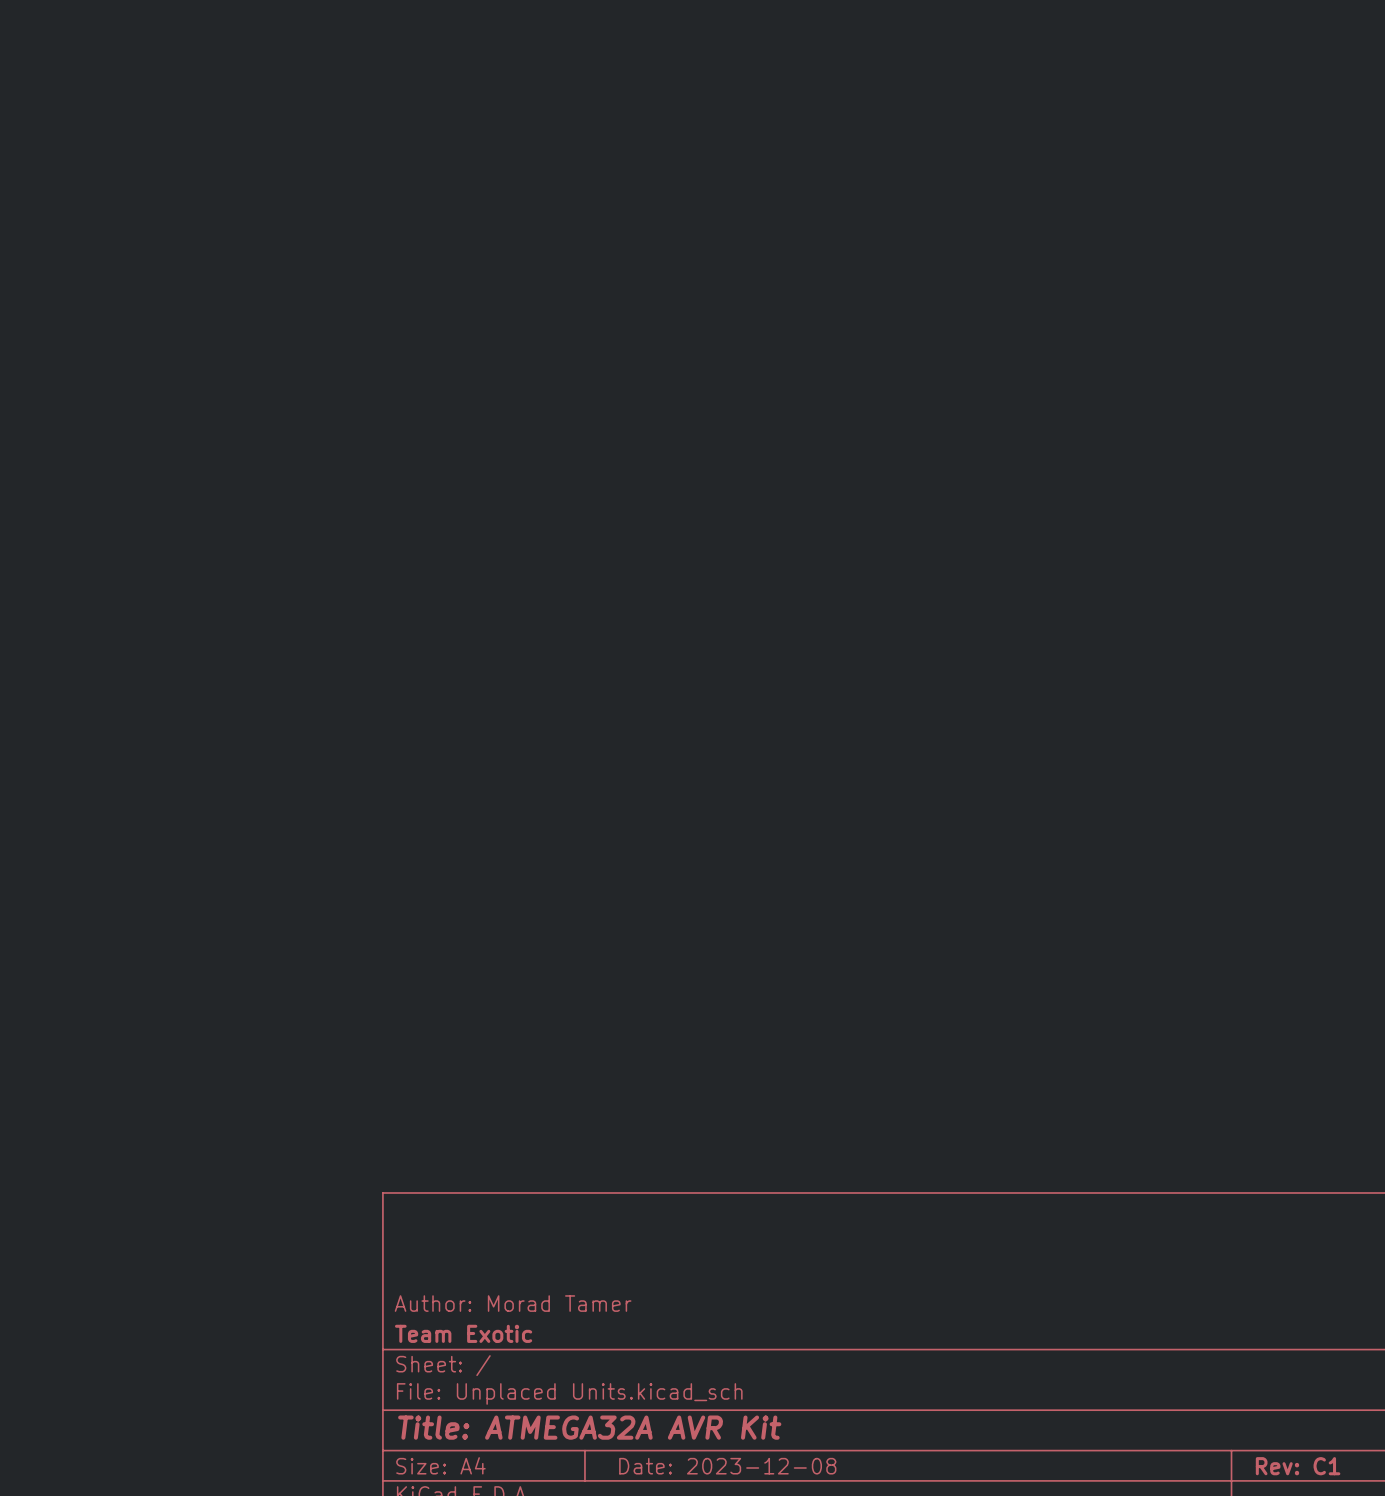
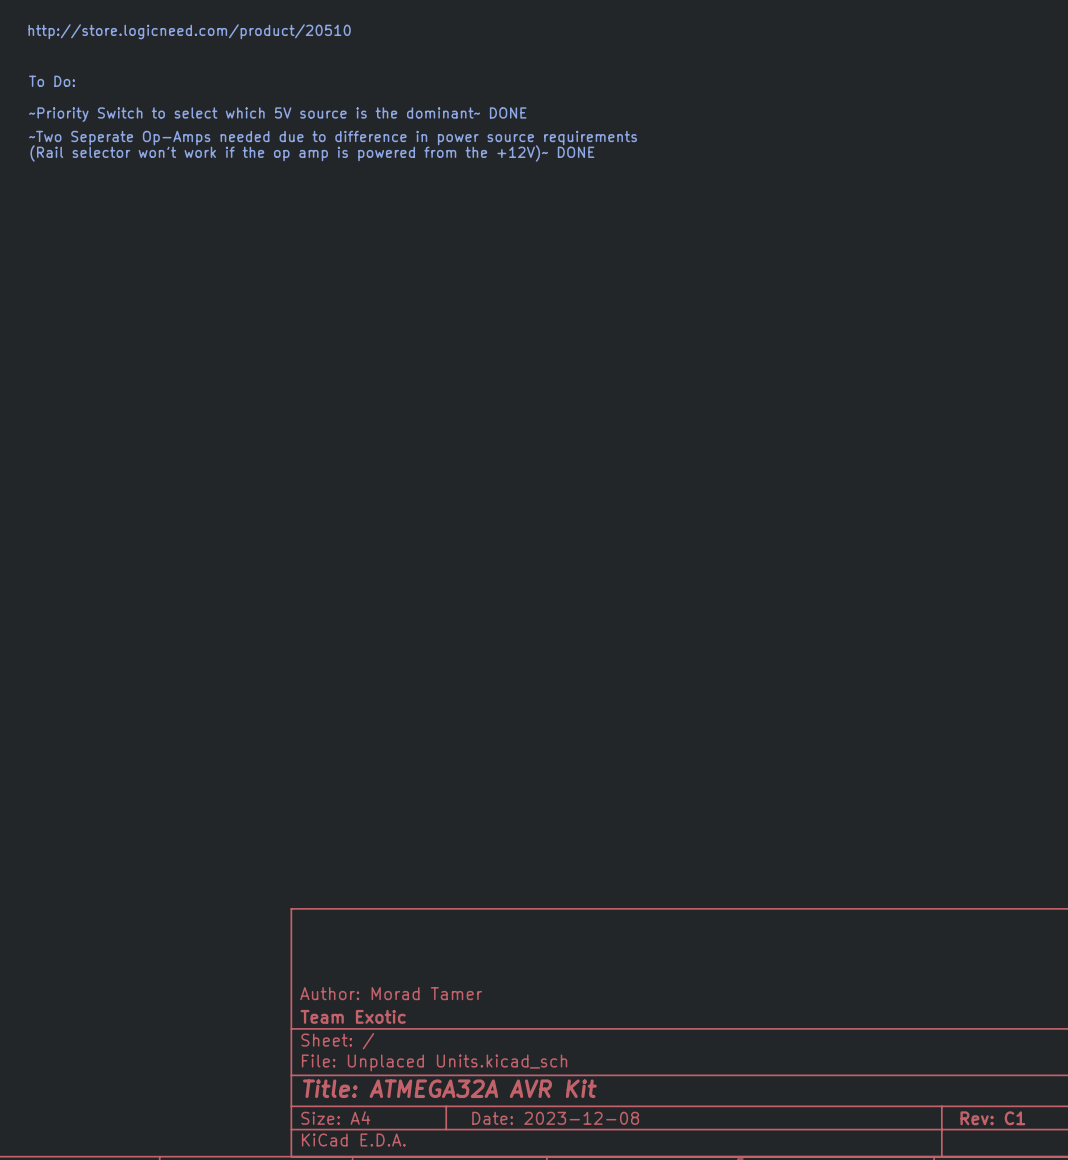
text: none -> http://store.logicneed.com/product/20510 (189, 31)
text: none -> To Do: (52, 81)
text: none -> ~Priority Switch to select which 5V source is the dominant~ DONE (277, 114)
text: none -> ~Two Seperate Op-Amps needed due to difference in power source requirements (333, 138)
text: none -> (Rail selector won't work if the op amp is powered from the +12V)~ DONE (312, 153)

